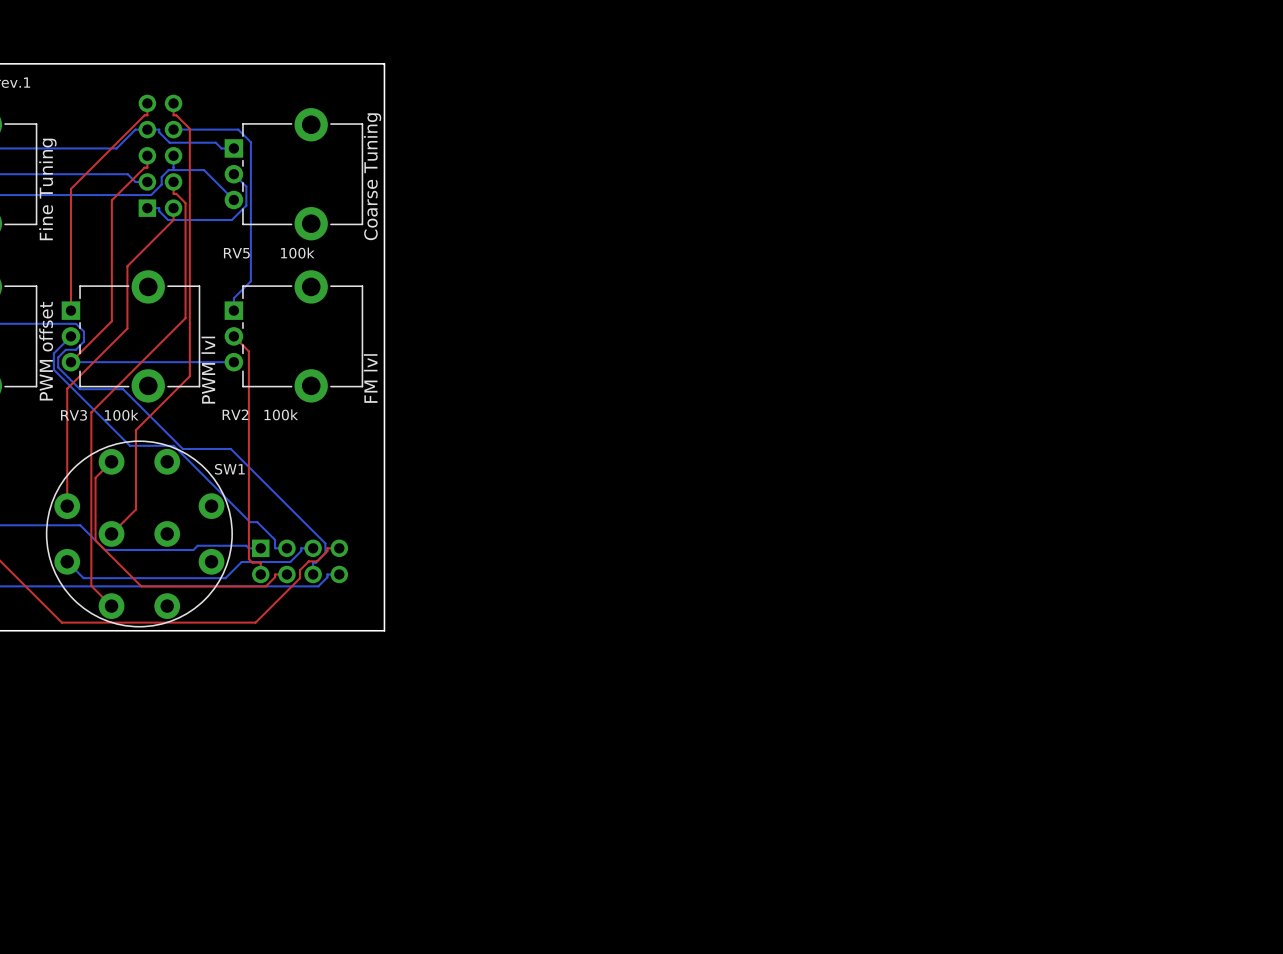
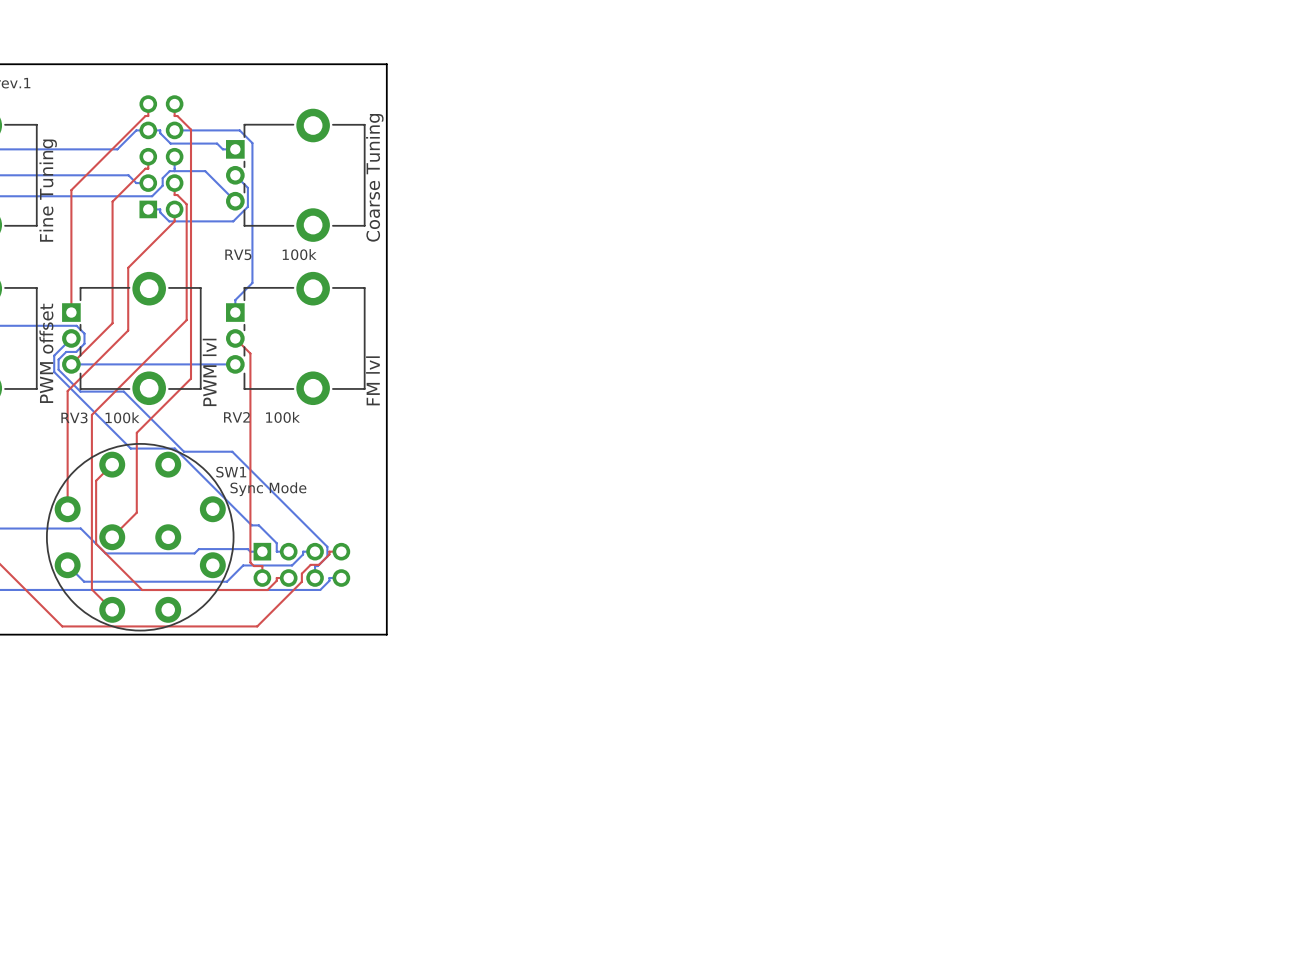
SW1 text: none -> Sync Mode (268, 489)

